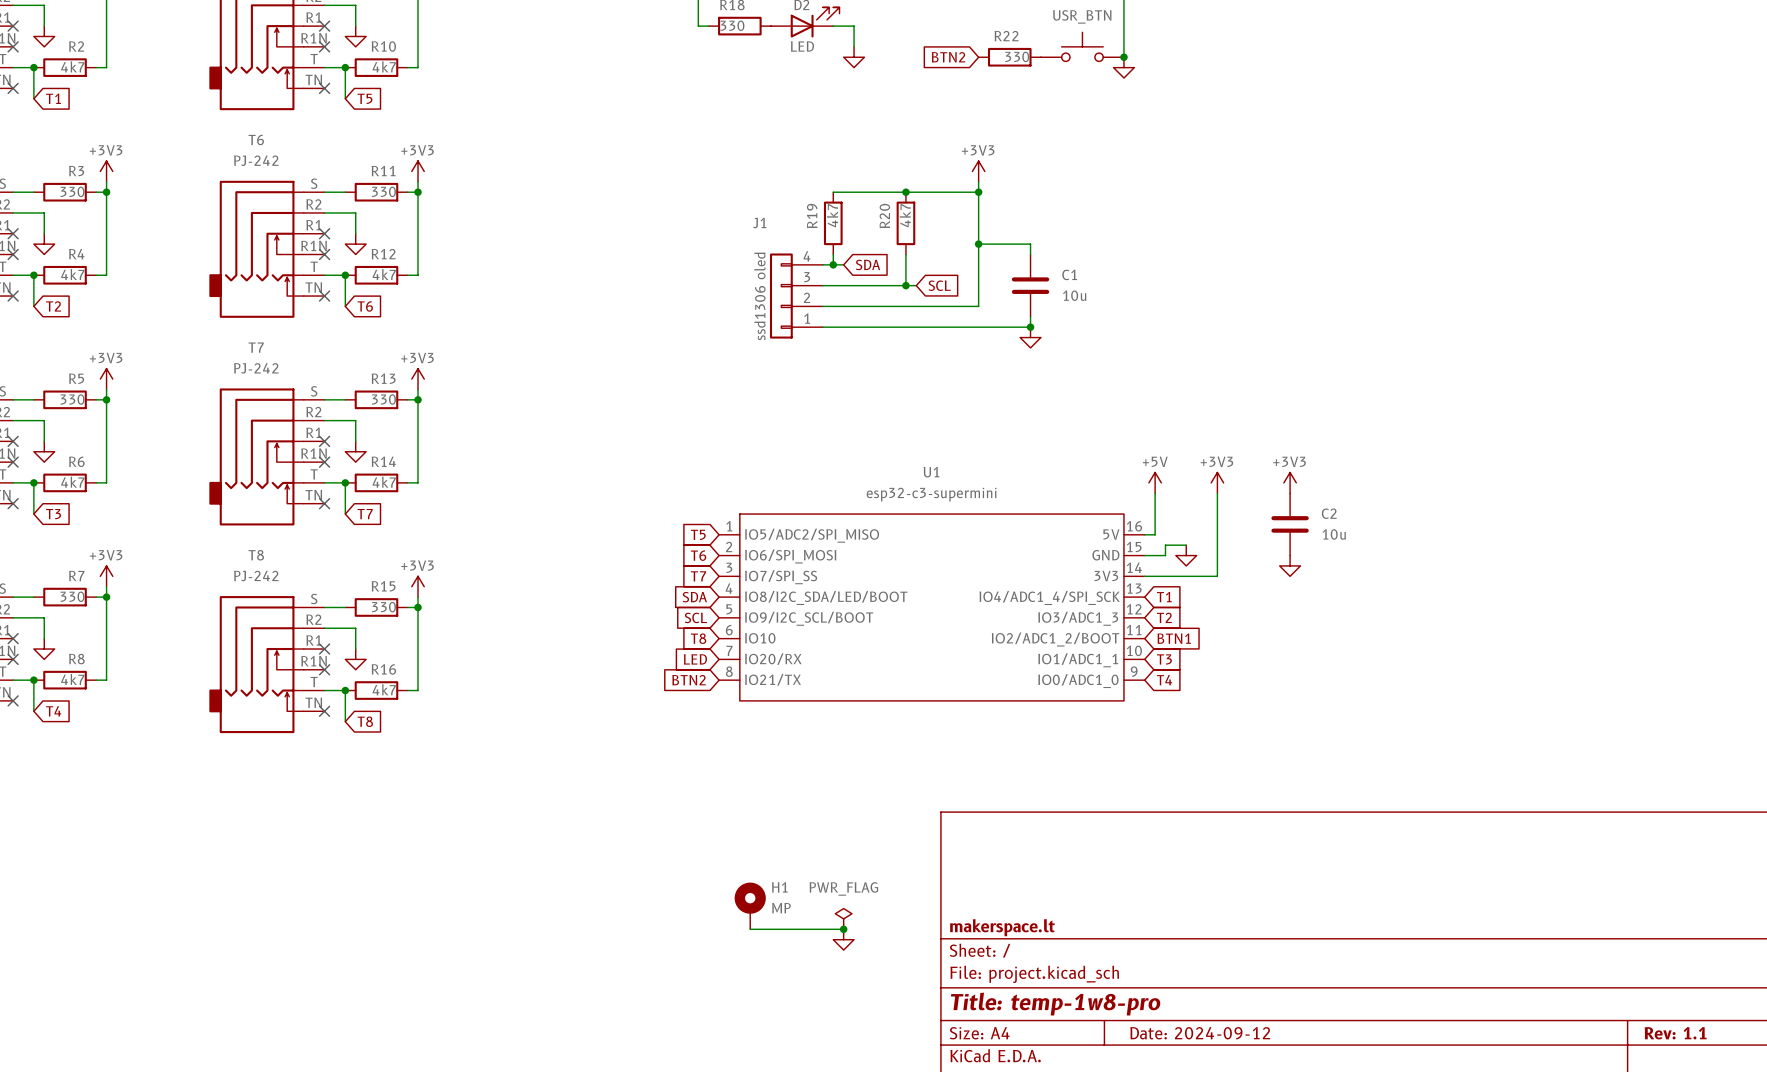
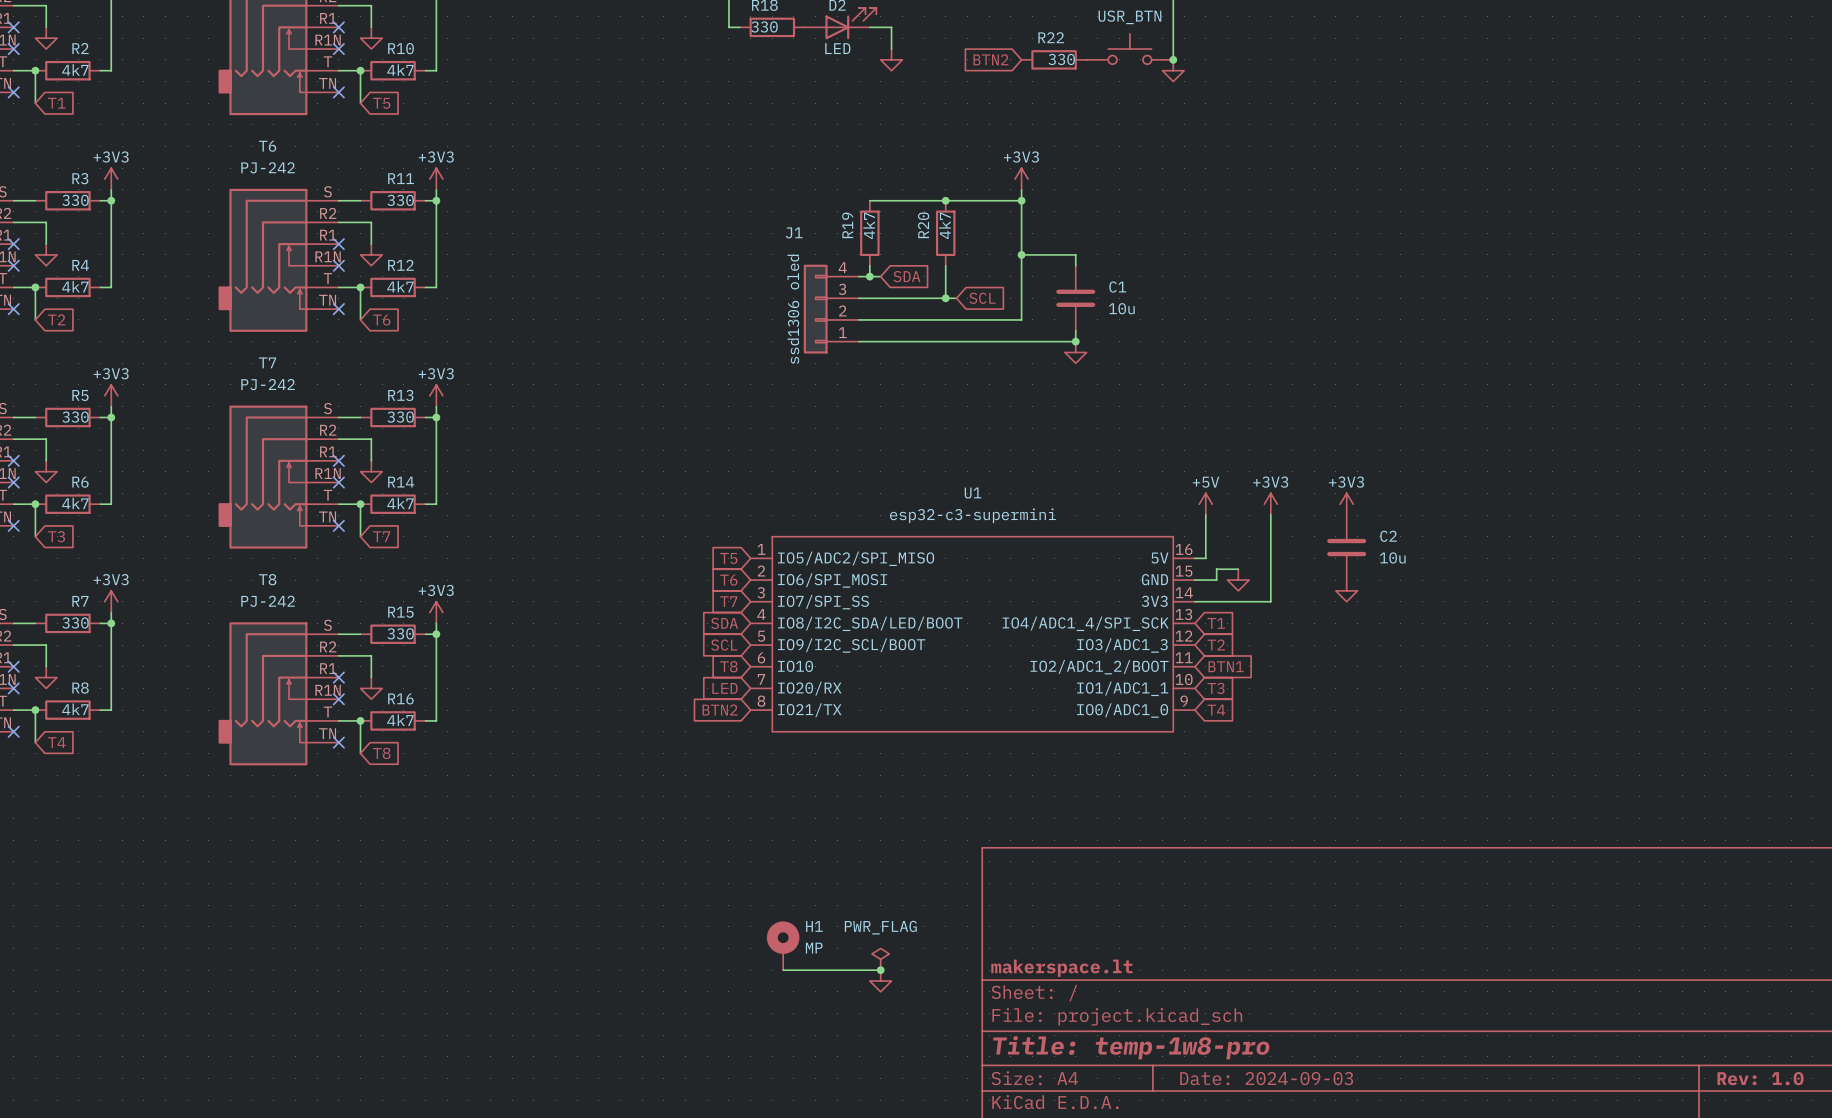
title block: Date: 2024-09-12 (1200, 1033) -> Date: 2024-09-03 (1266, 1078)
title block: Rev: 1.1 (1675, 1033) -> Rev: 1.0 (1760, 1078)

